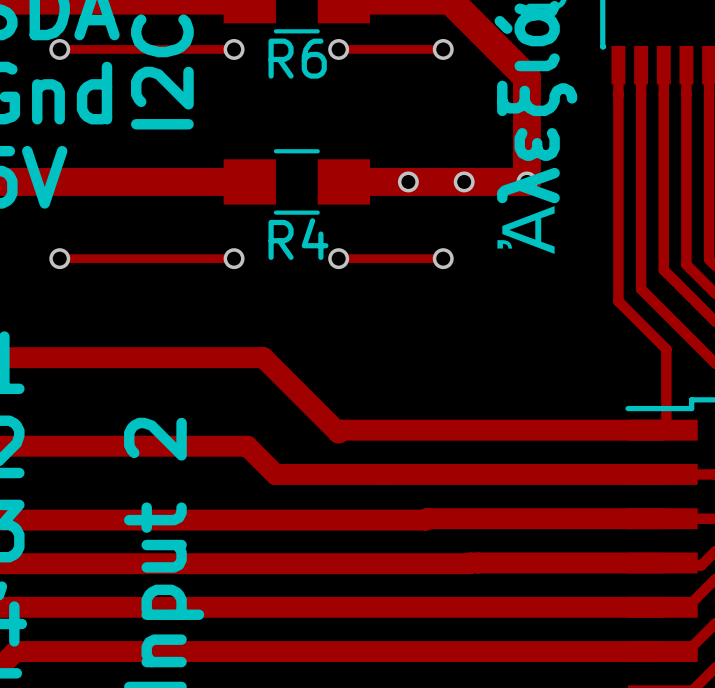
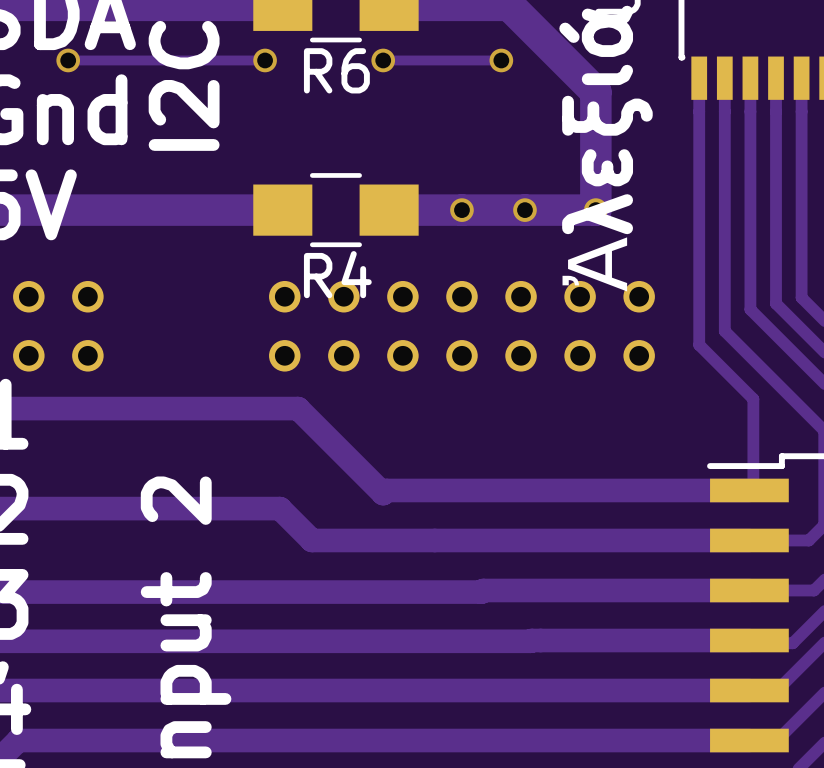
part: none -> (28, 296)
track: (59, 258) (234, 258) -> none
via: (59, 258) -> none
part: none -> (87, 296)
via: (234, 258) -> none
part: none -> (284, 296)
part: none -> (343, 296)
track: (338, 258) (443, 258) -> none
via: (338, 258) -> none
part: none -> (402, 296)
part: none -> (461, 296)
via: (443, 258) -> none
part: none -> (521, 296)
part: none -> (580, 296)
part: none -> (639, 296)
part: none -> (28, 355)
part: none -> (87, 355)
part: none -> (284, 355)
part: none -> (343, 355)
part: none -> (402, 355)
part: none -> (461, 355)
part: none -> (521, 355)
part: none -> (580, 355)
part: none -> (639, 355)

